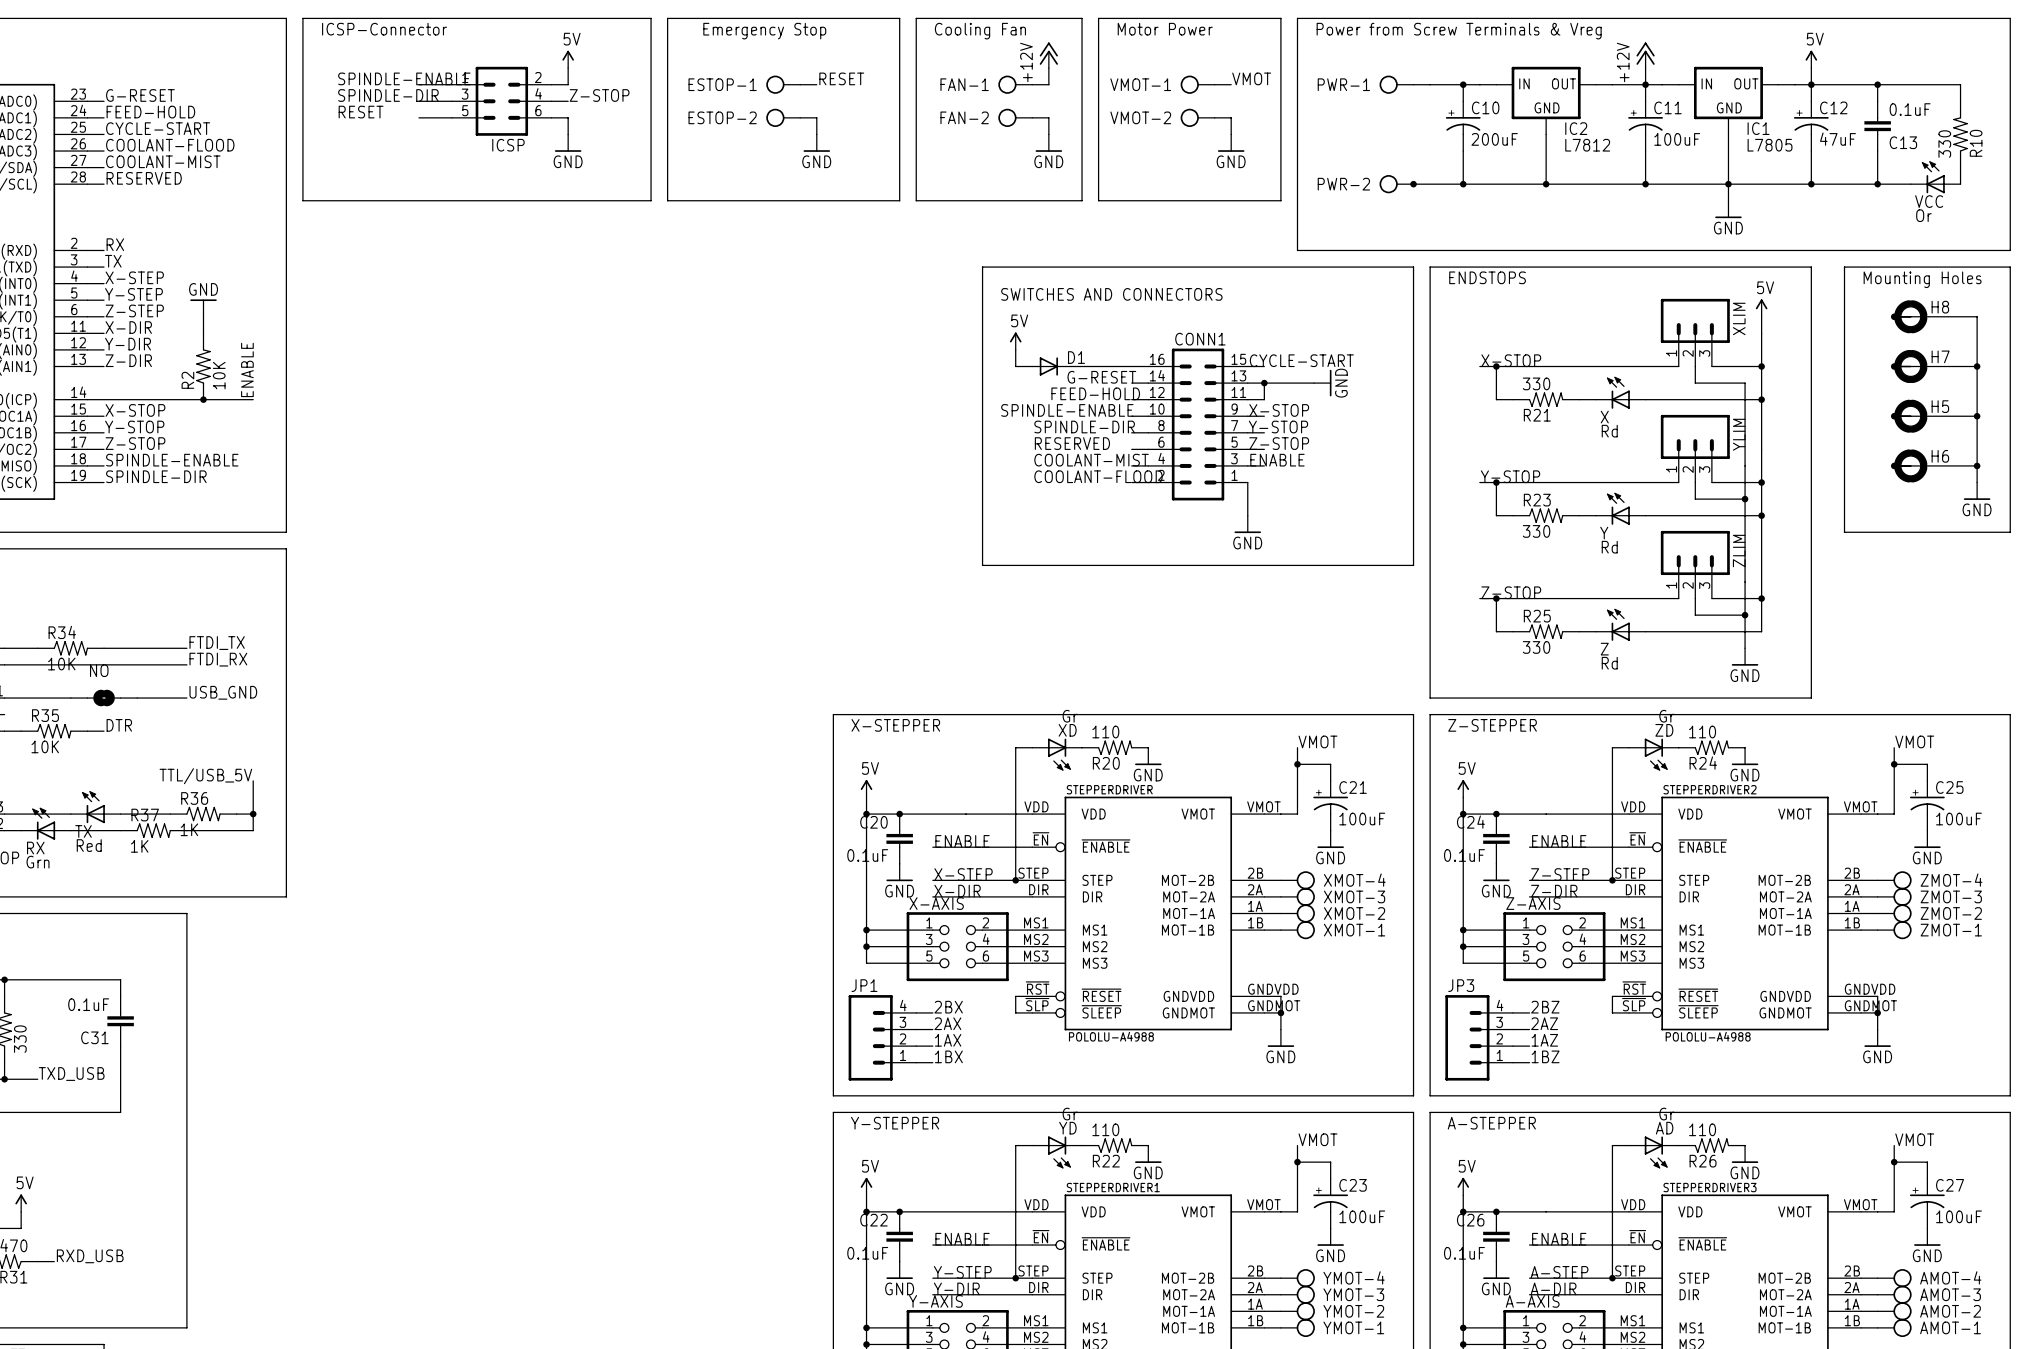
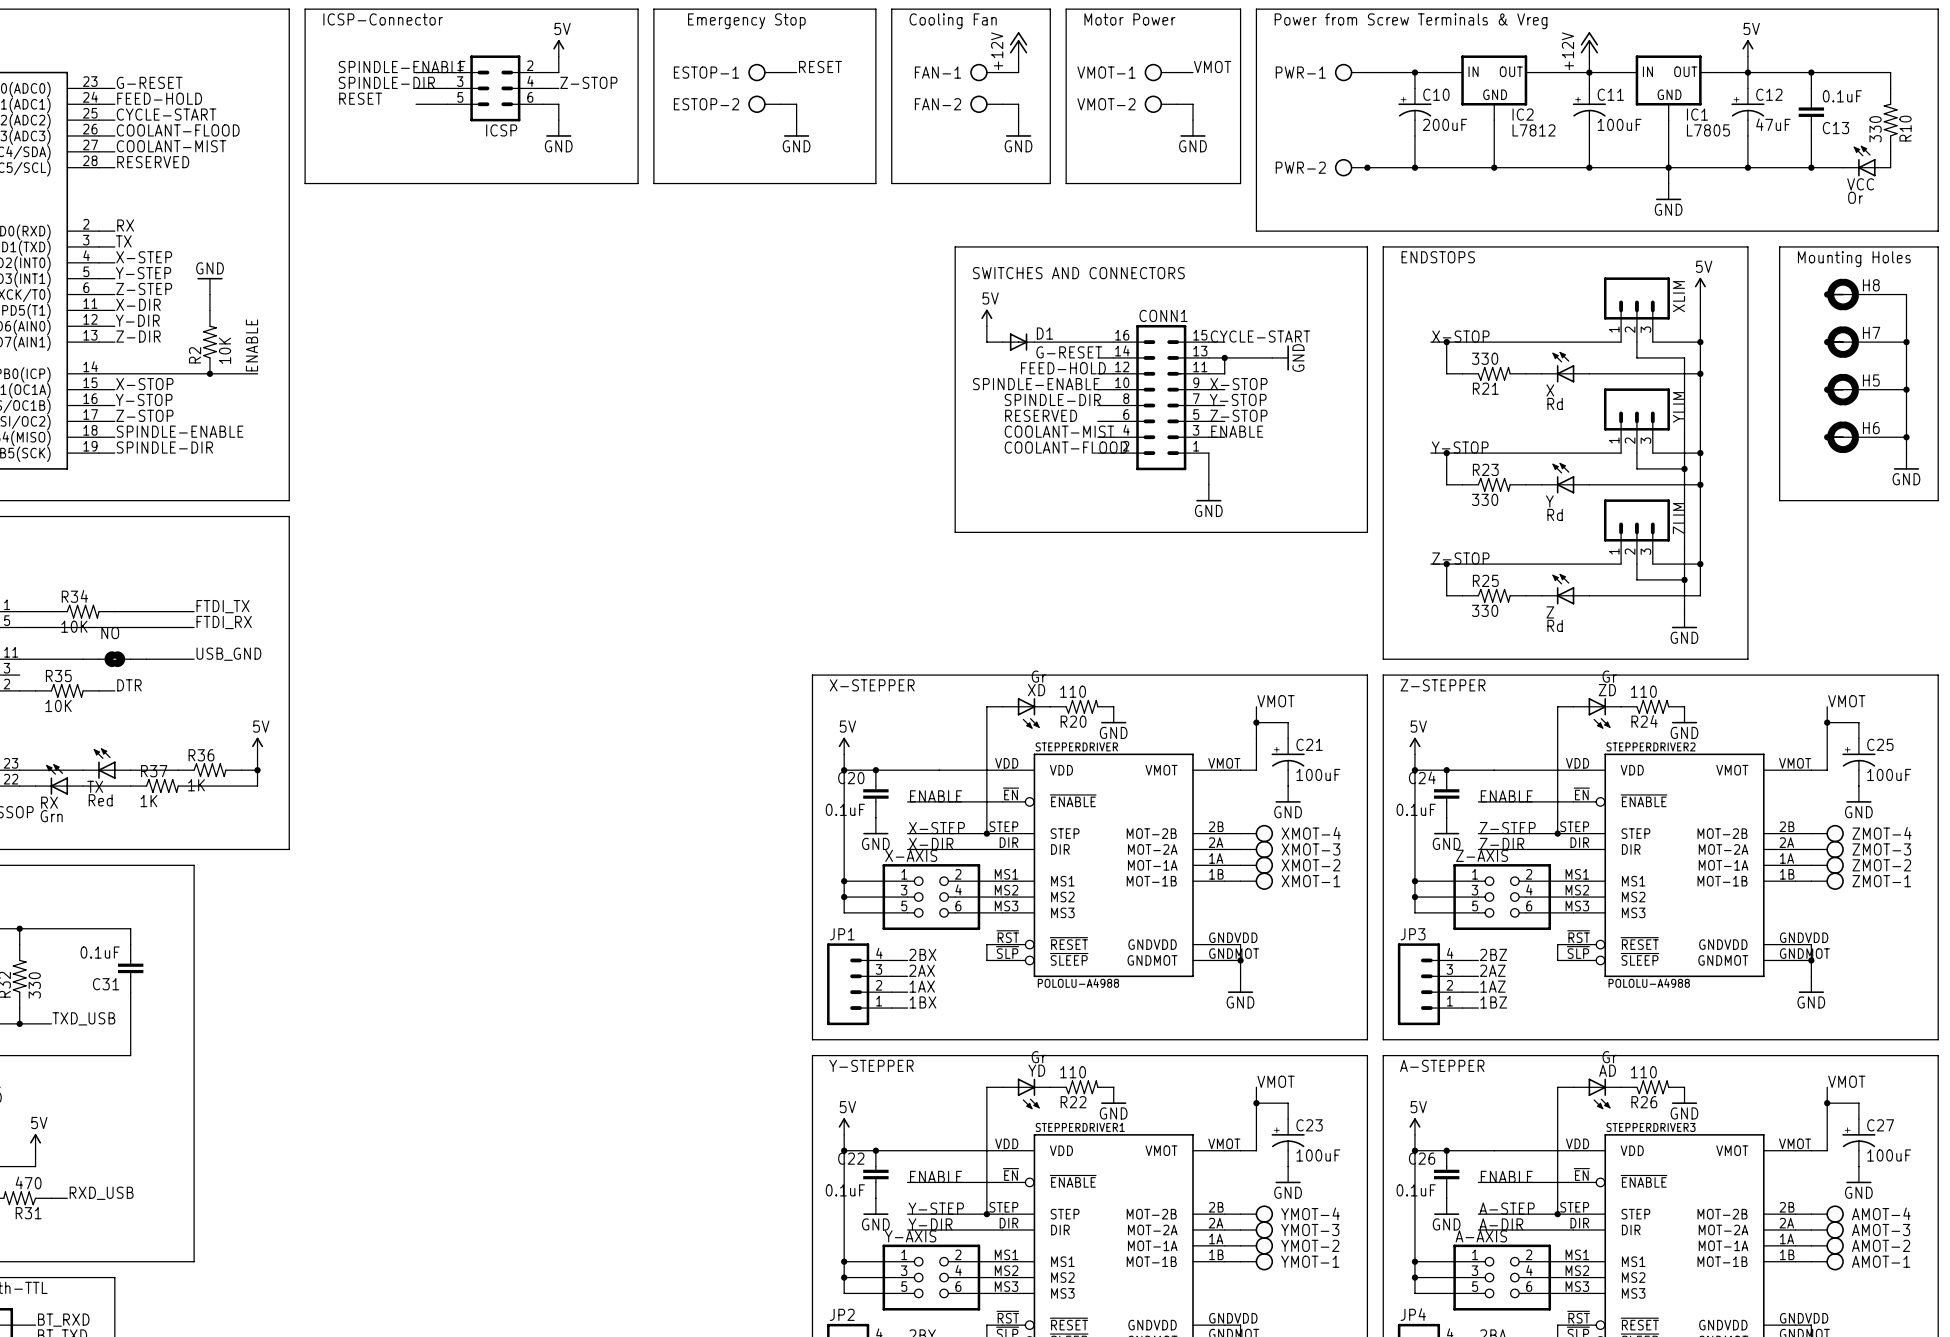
label: TTL/USB_5V (205, 776) -> none
power symbol: none -> 5V (257, 746)

